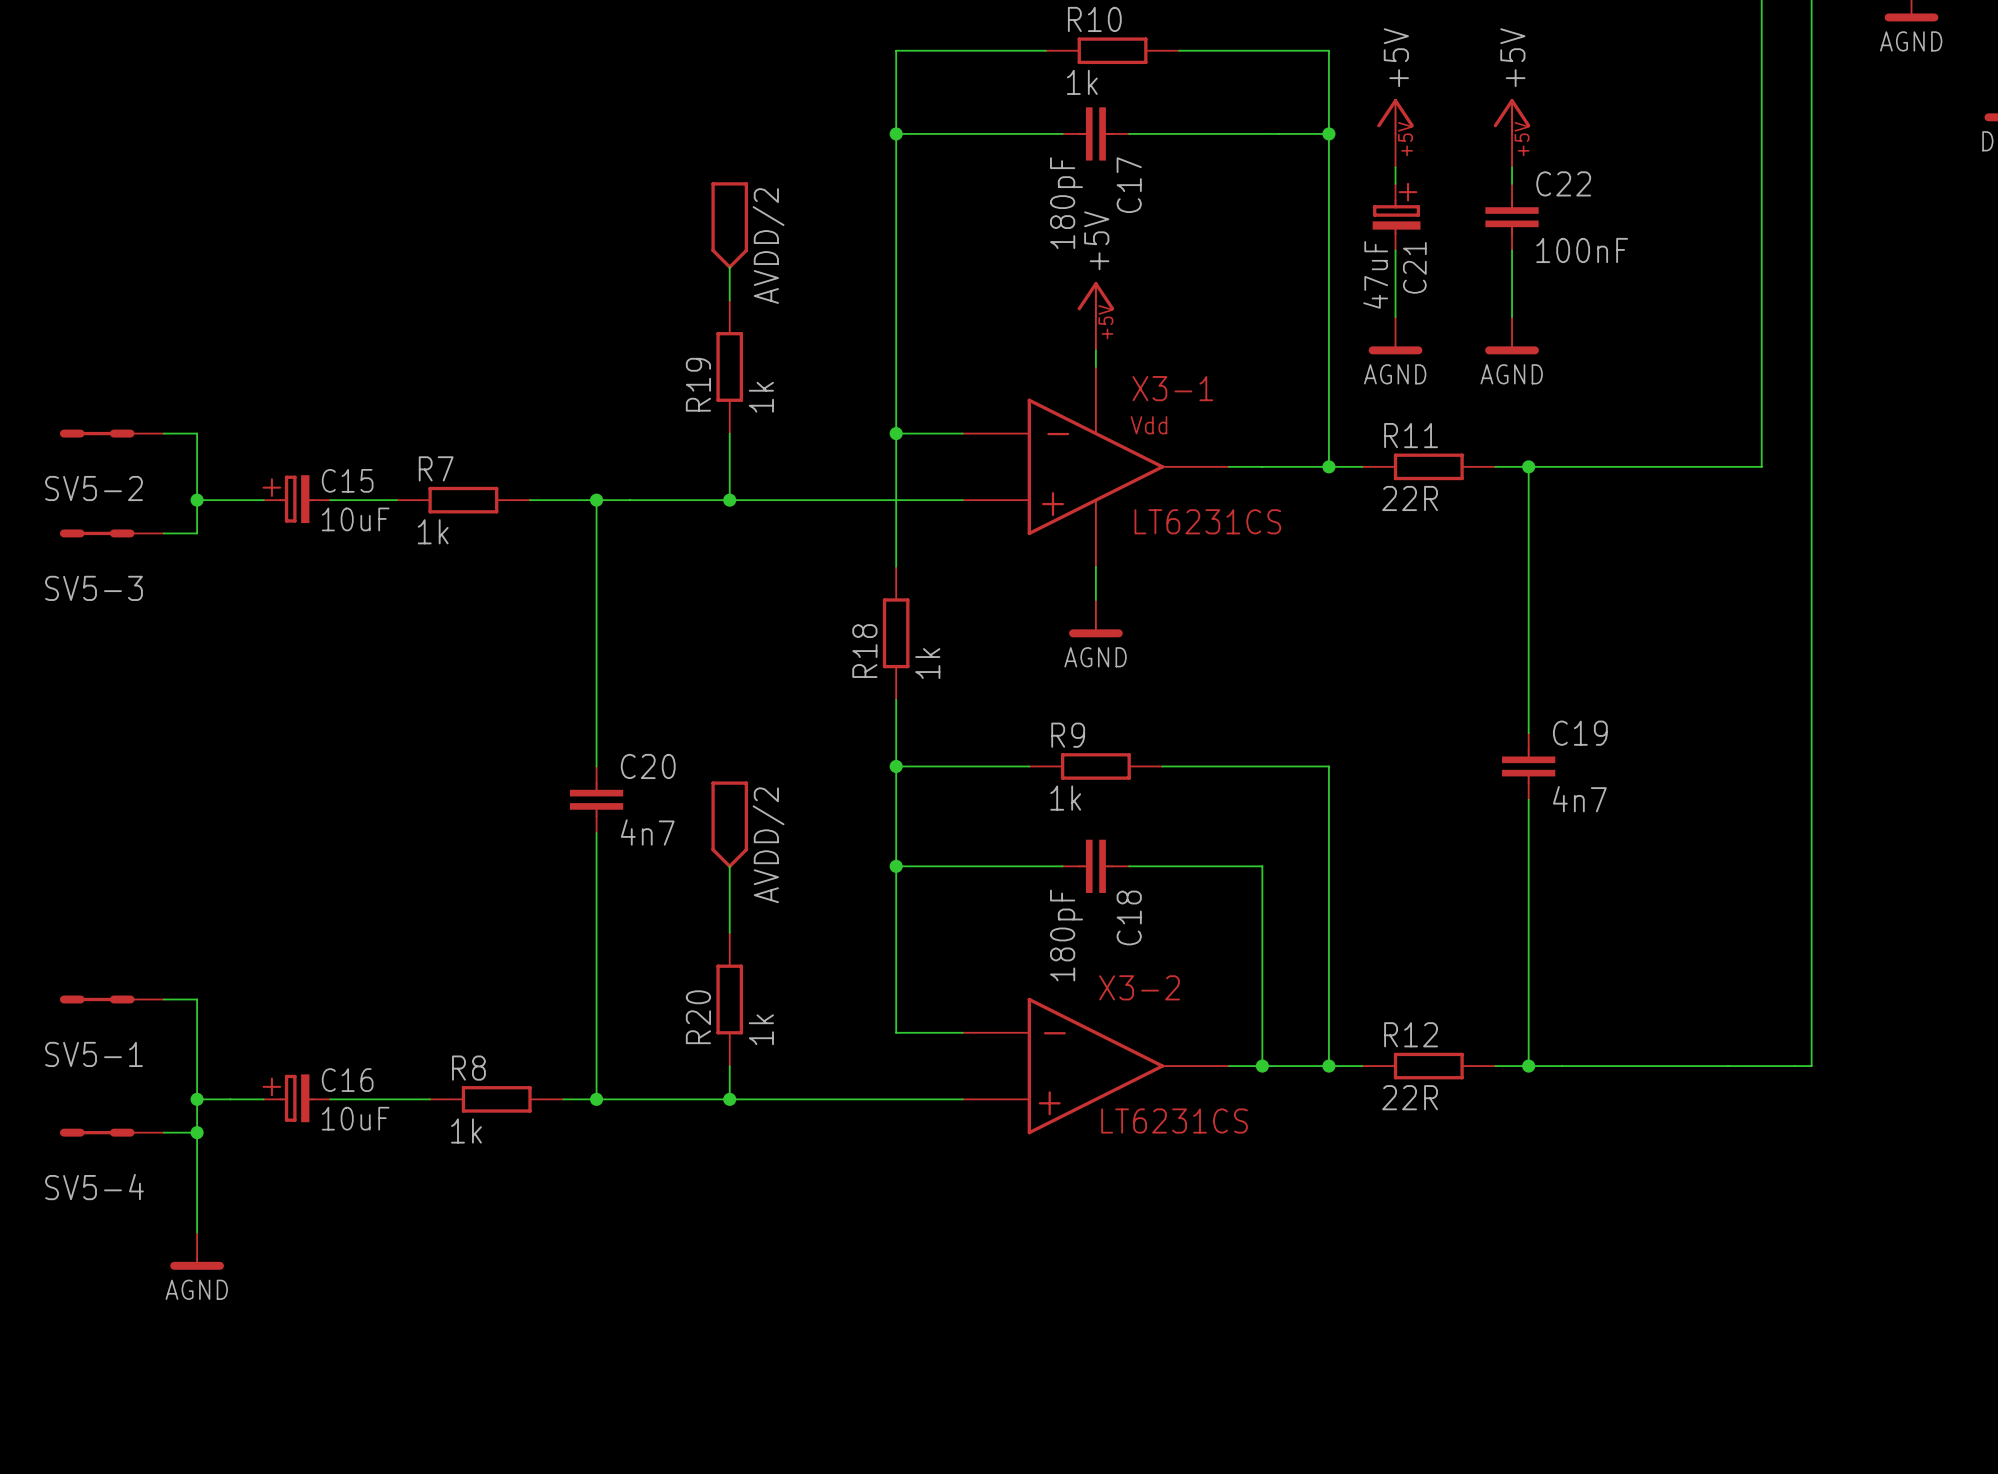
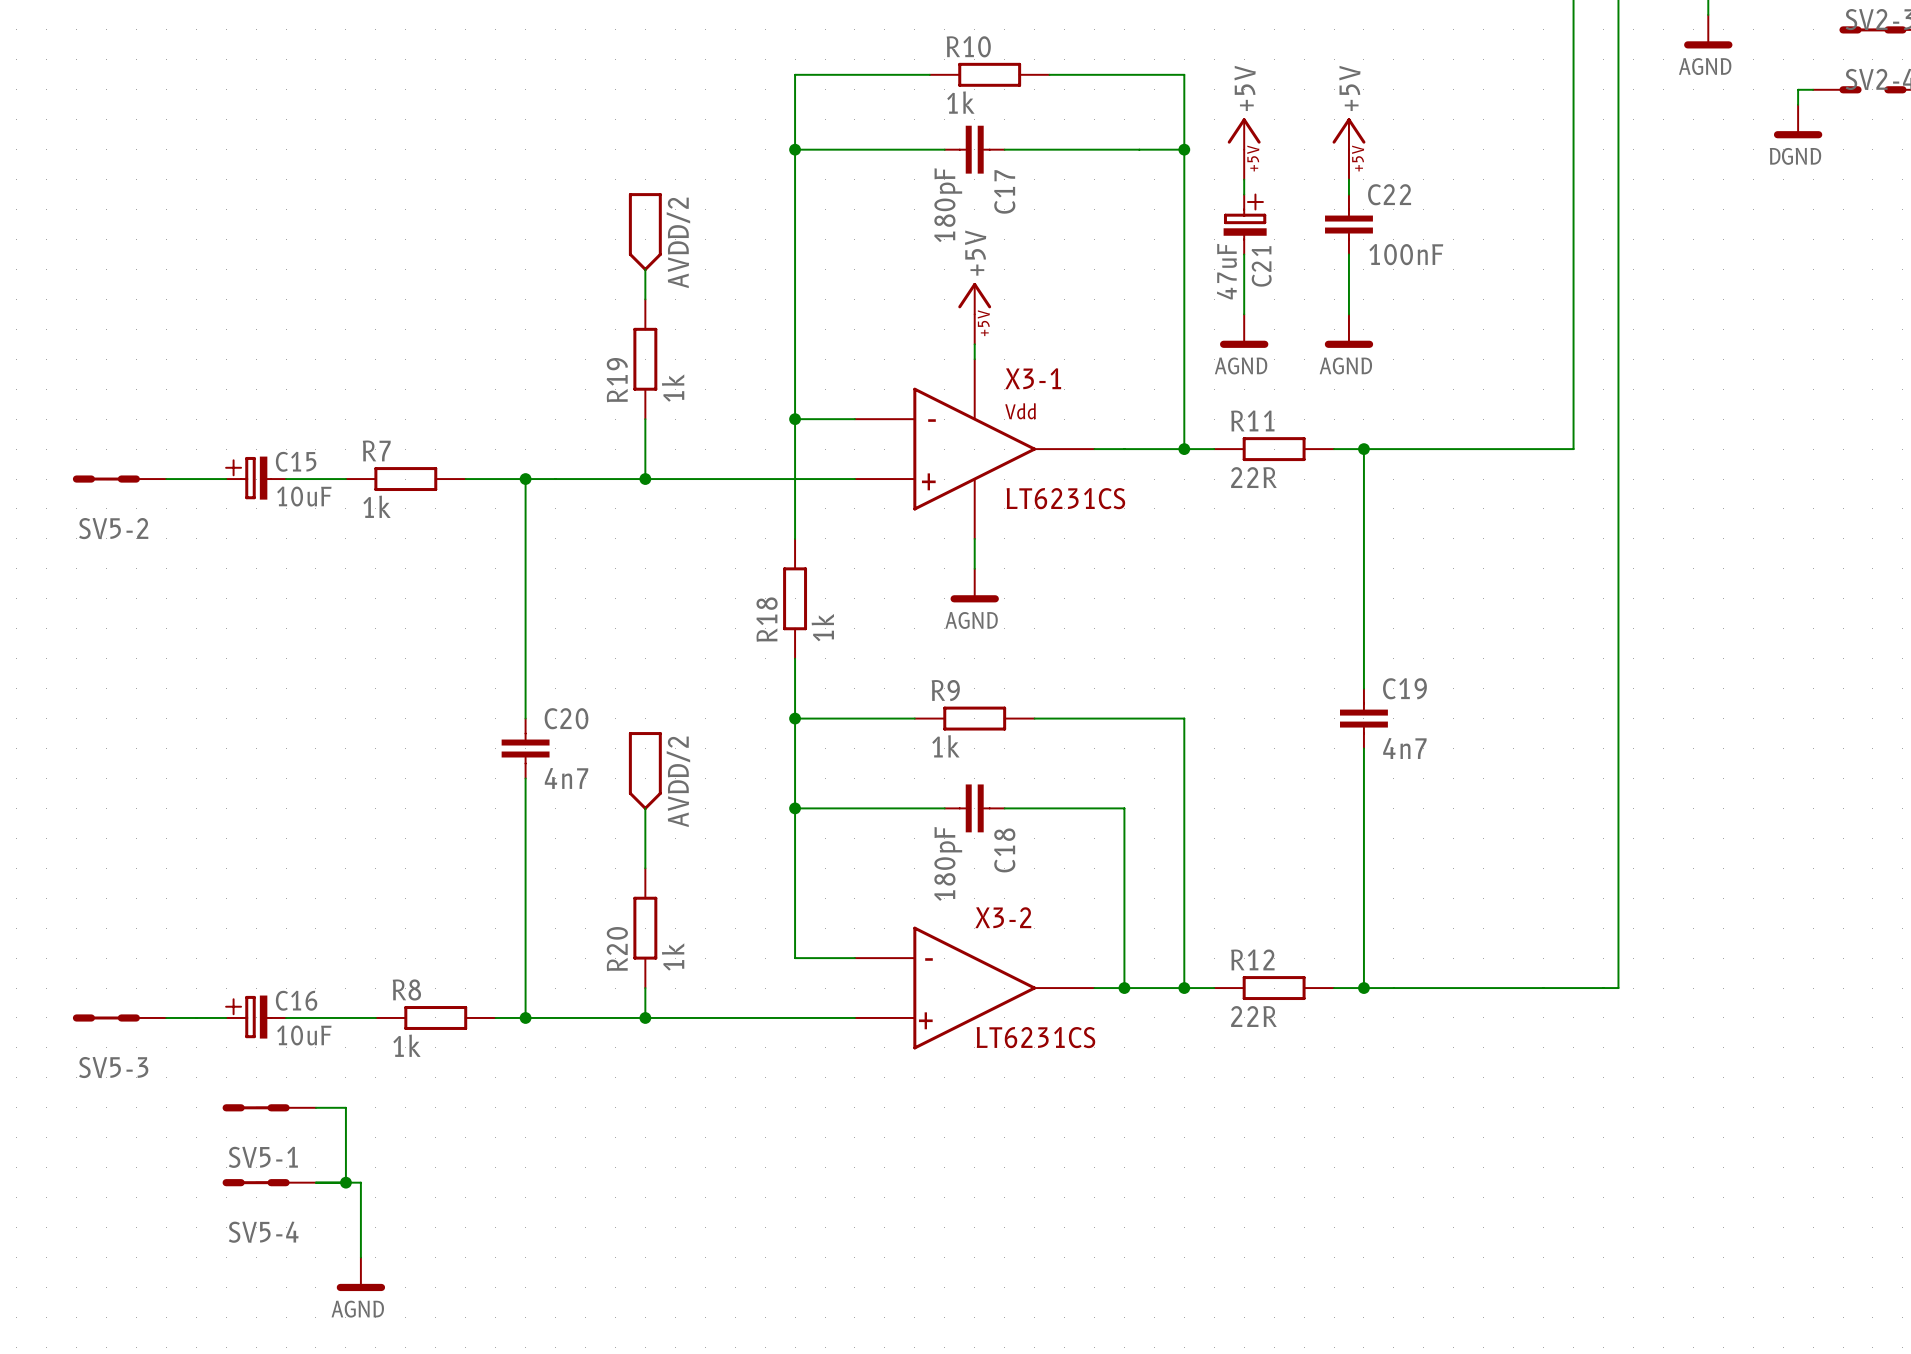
SV5-2 position: (111, 433) -> (119, 479)
wire: (163, 433) (197, 433) (197, 533) (163, 533) -> none
junction: (197, 500) -> none
SV5-3 position: (111, 533) -> (119, 1017)
SV5-1 position: (111, 999) -> (269, 1107)
wire: (163, 999) (197, 999) (197, 1232) -> none
junction: (197, 1099) -> none
SV5-4 position: (111, 1132) -> (269, 1182)
wire: (163, 1132) (197, 1132) -> none
junction: (197, 1132) -> none
wire: none -> (315, 1107) (345, 1107) (345, 1182)
power symbol position: (197, 1251) -> (360, 1274)
wire: none -> (315, 1182) (360, 1182) (360, 1257)
junction: none -> (345, 1182)

